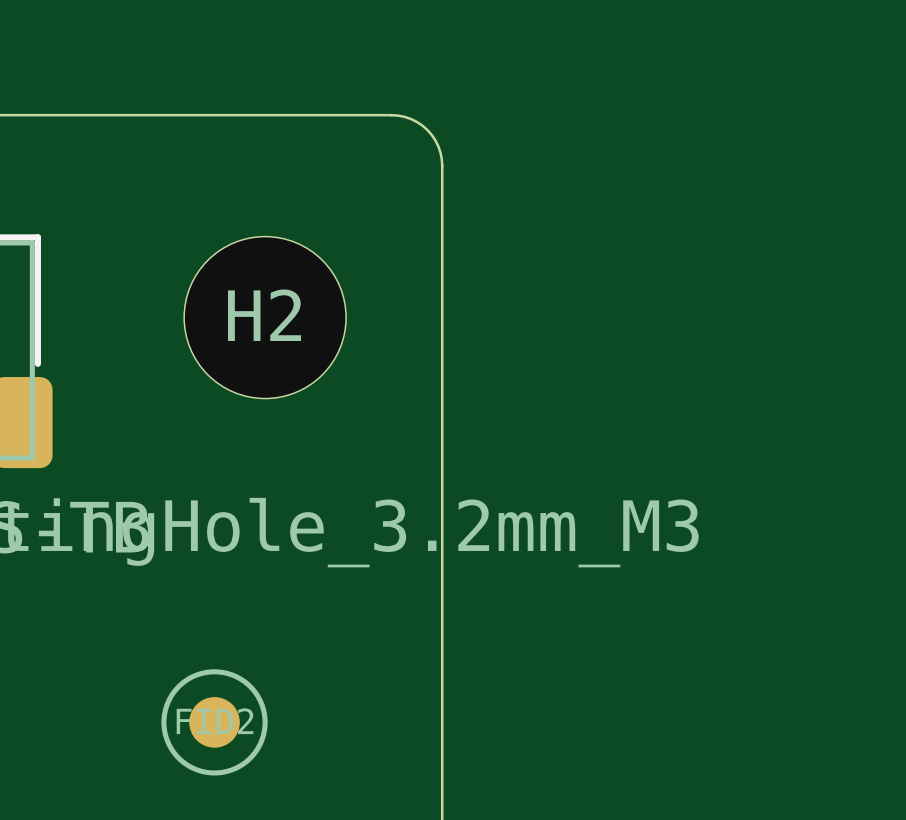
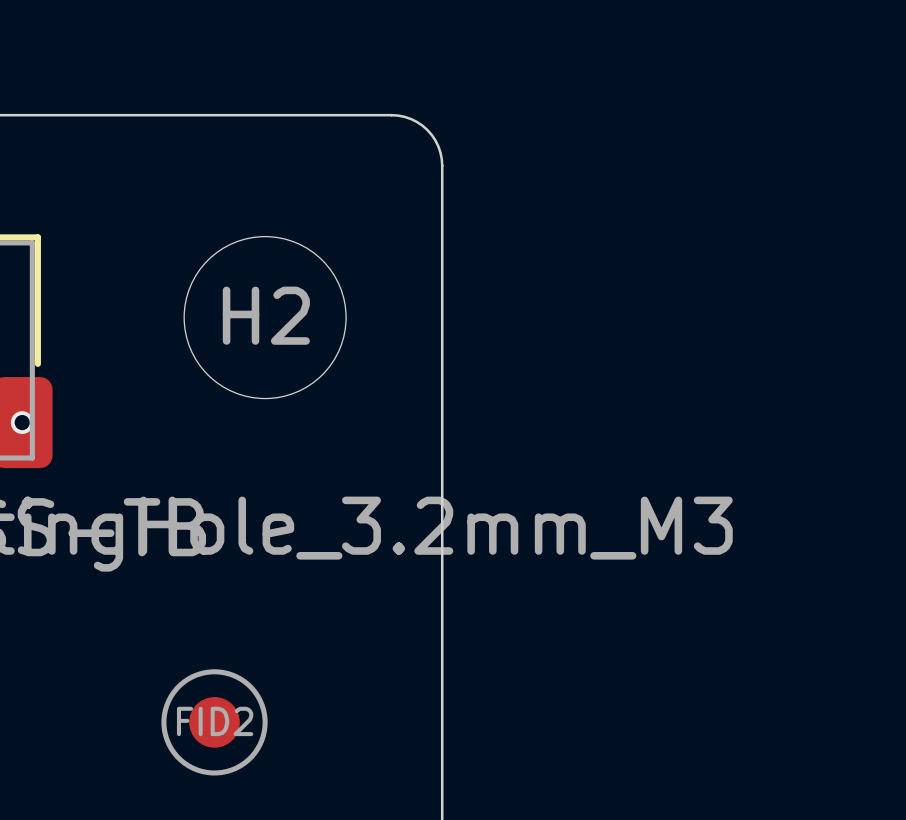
via: none -> (22, 422)

